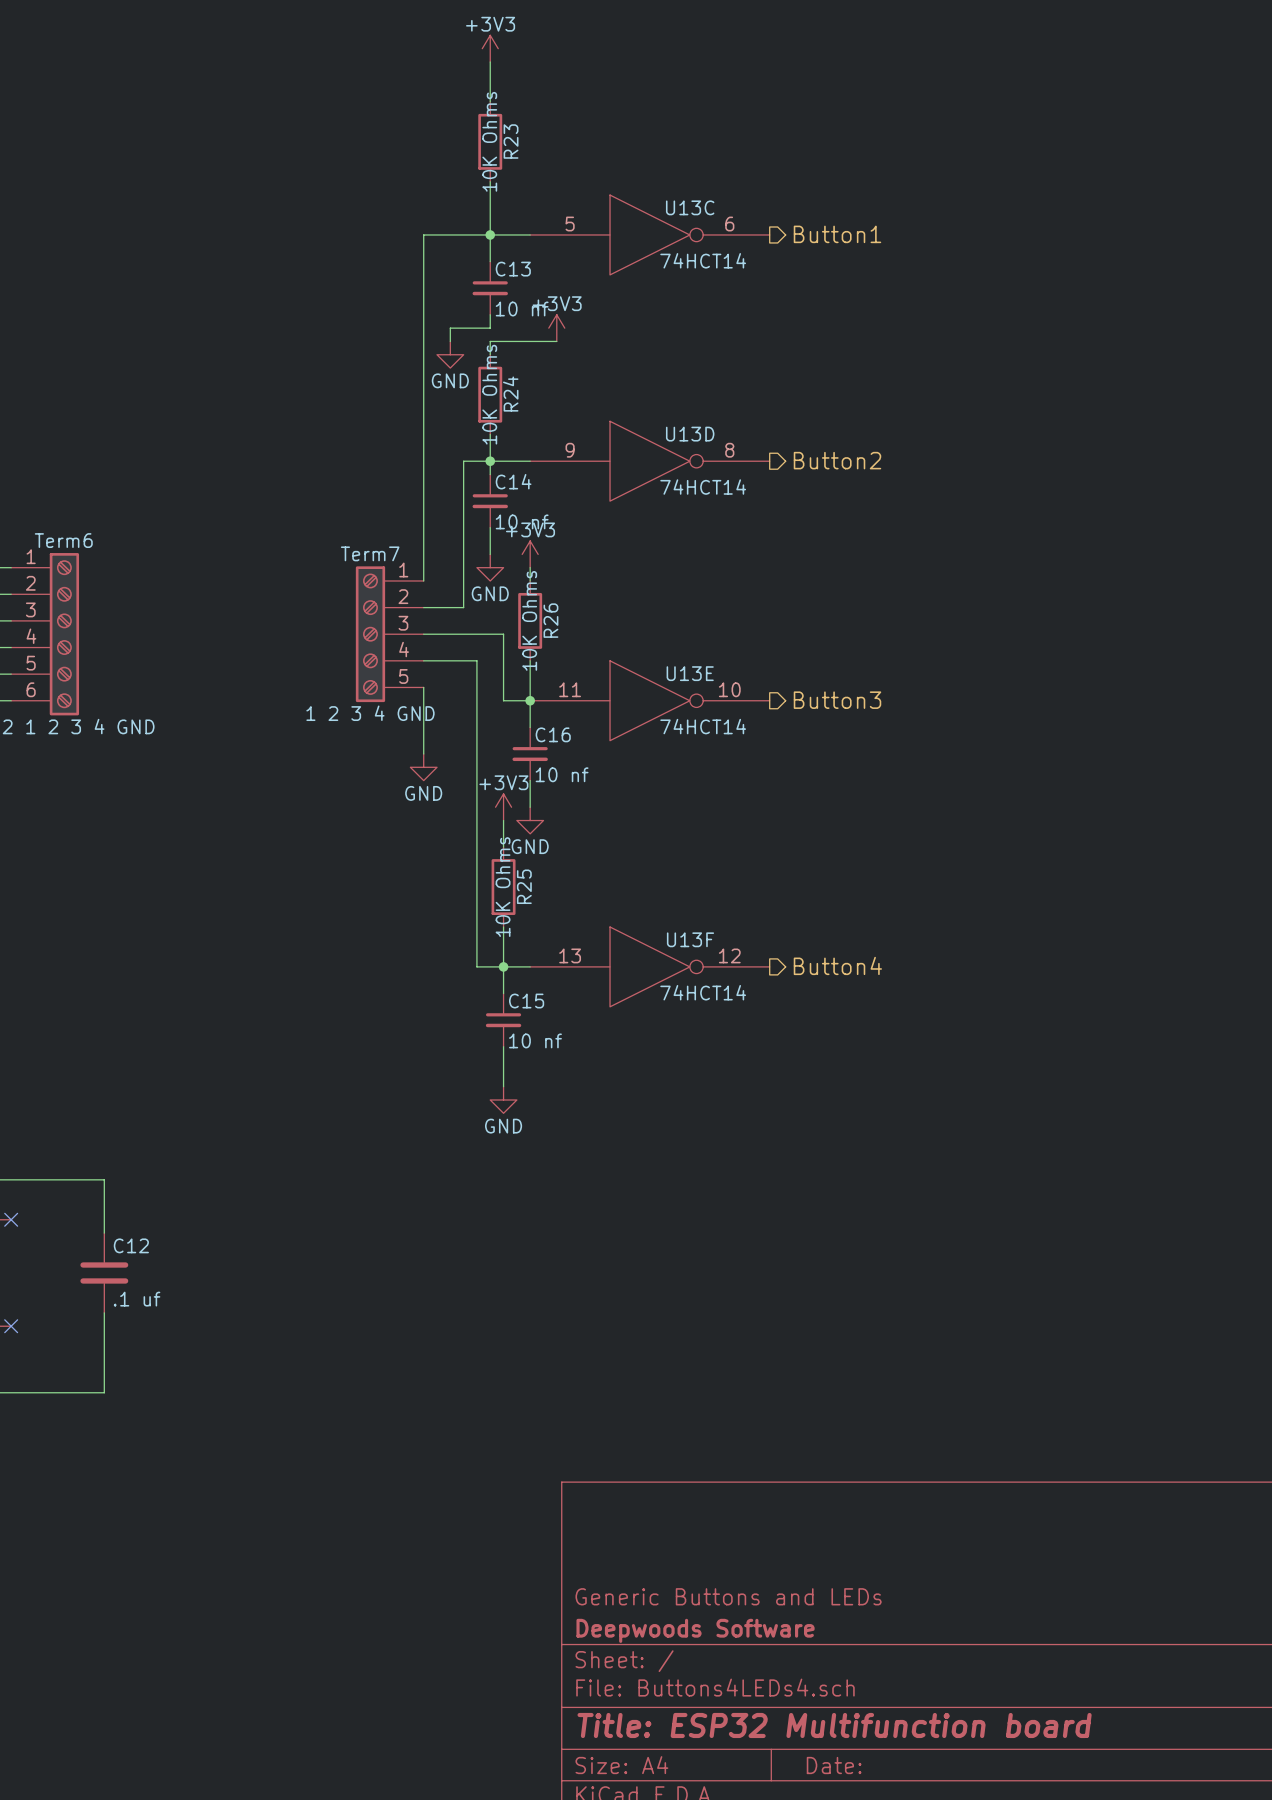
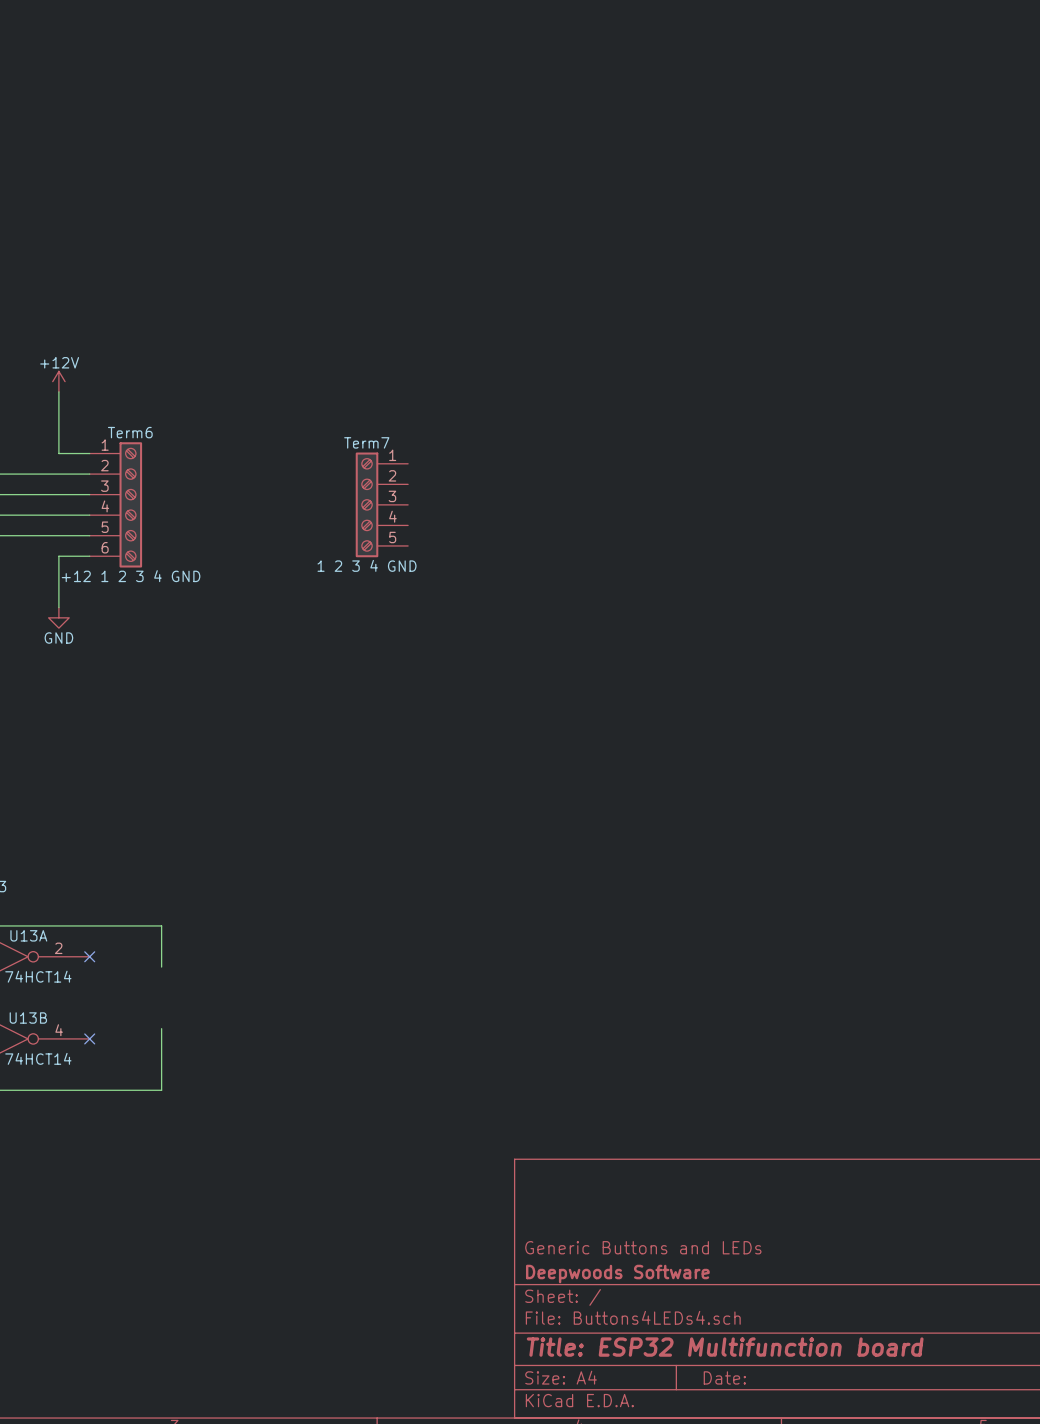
power symbol: +3V3 (490, 48) -> none
wire: (490, 61) (490, 101) -> none
R23: 10K Ohms (490, 141) -> none
wire: (490, 181) (490, 261) -> none
junction: (490, 234) -> none
wire: (530, 234) (423, 234) (423, 580) -> none
U13C: 74HCT14 (649, 234) -> none
hierarchical label: Button1 (837, 234) -> none
C13: 10 nf (490, 288) -> none
wire: (490, 314) (490, 328) (450, 328) (450, 341) -> none
power symbol: +3V3 (556, 328) -> none
wire: (556, 341) (490, 341) (490, 354) -> none
power symbol: GND (450, 354) -> none
R24: 10K Ohms (490, 394) -> none
wire: (490, 434) (490, 474) -> none
hierarchical label: Button2 (837, 460) -> none
junction: (490, 461) -> none
wire: (530, 461) (463, 461) (463, 607) (423, 607) -> none
U13D: 74HCT14 (649, 461) -> none
C14: 10 nf (490, 501) -> none
wire: (490, 527) (490, 554) -> none
power symbol: +3V3 (530, 554) -> none
power symbol: GND (490, 567) -> none
wire: (530, 567) (530, 580) -> none
R26: 10K Ohms (530, 620) -> none
wire: (423, 634) (503, 634) (503, 700) (530, 700) -> none
wire: (423, 660) (476, 660) (476, 966) (530, 966) -> none
wire: (530, 660) (530, 727) -> none
wire: (423, 687) (423, 753) -> none
junction: (530, 700) -> none
U13E: 74HCT14 (649, 700) -> none
hierarchical label: Button3 (837, 700) -> none
C16: 10 nf (530, 753) -> none
power symbol: GND (423, 767) -> none
wire: (530, 780) (530, 807) -> none
power symbol: +3V3 (503, 807) -> none
wire: (503, 820) (503, 847) -> none
power symbol: GND (530, 820) -> none
R25: 10K Ohms (503, 887) -> none
wire: (503, 926) (503, 993) -> none
hierarchical label: Button4 (837, 965) -> none
junction: (503, 966) -> none
U13F: 74HCT14 (649, 966) -> none
C15: 10 nf (503, 1020) -> none
wire: (503, 1046) (503, 1086) -> none
power symbol: GND (503, 1099) -> none
C12: .1 uf (104, 1272) -> none

